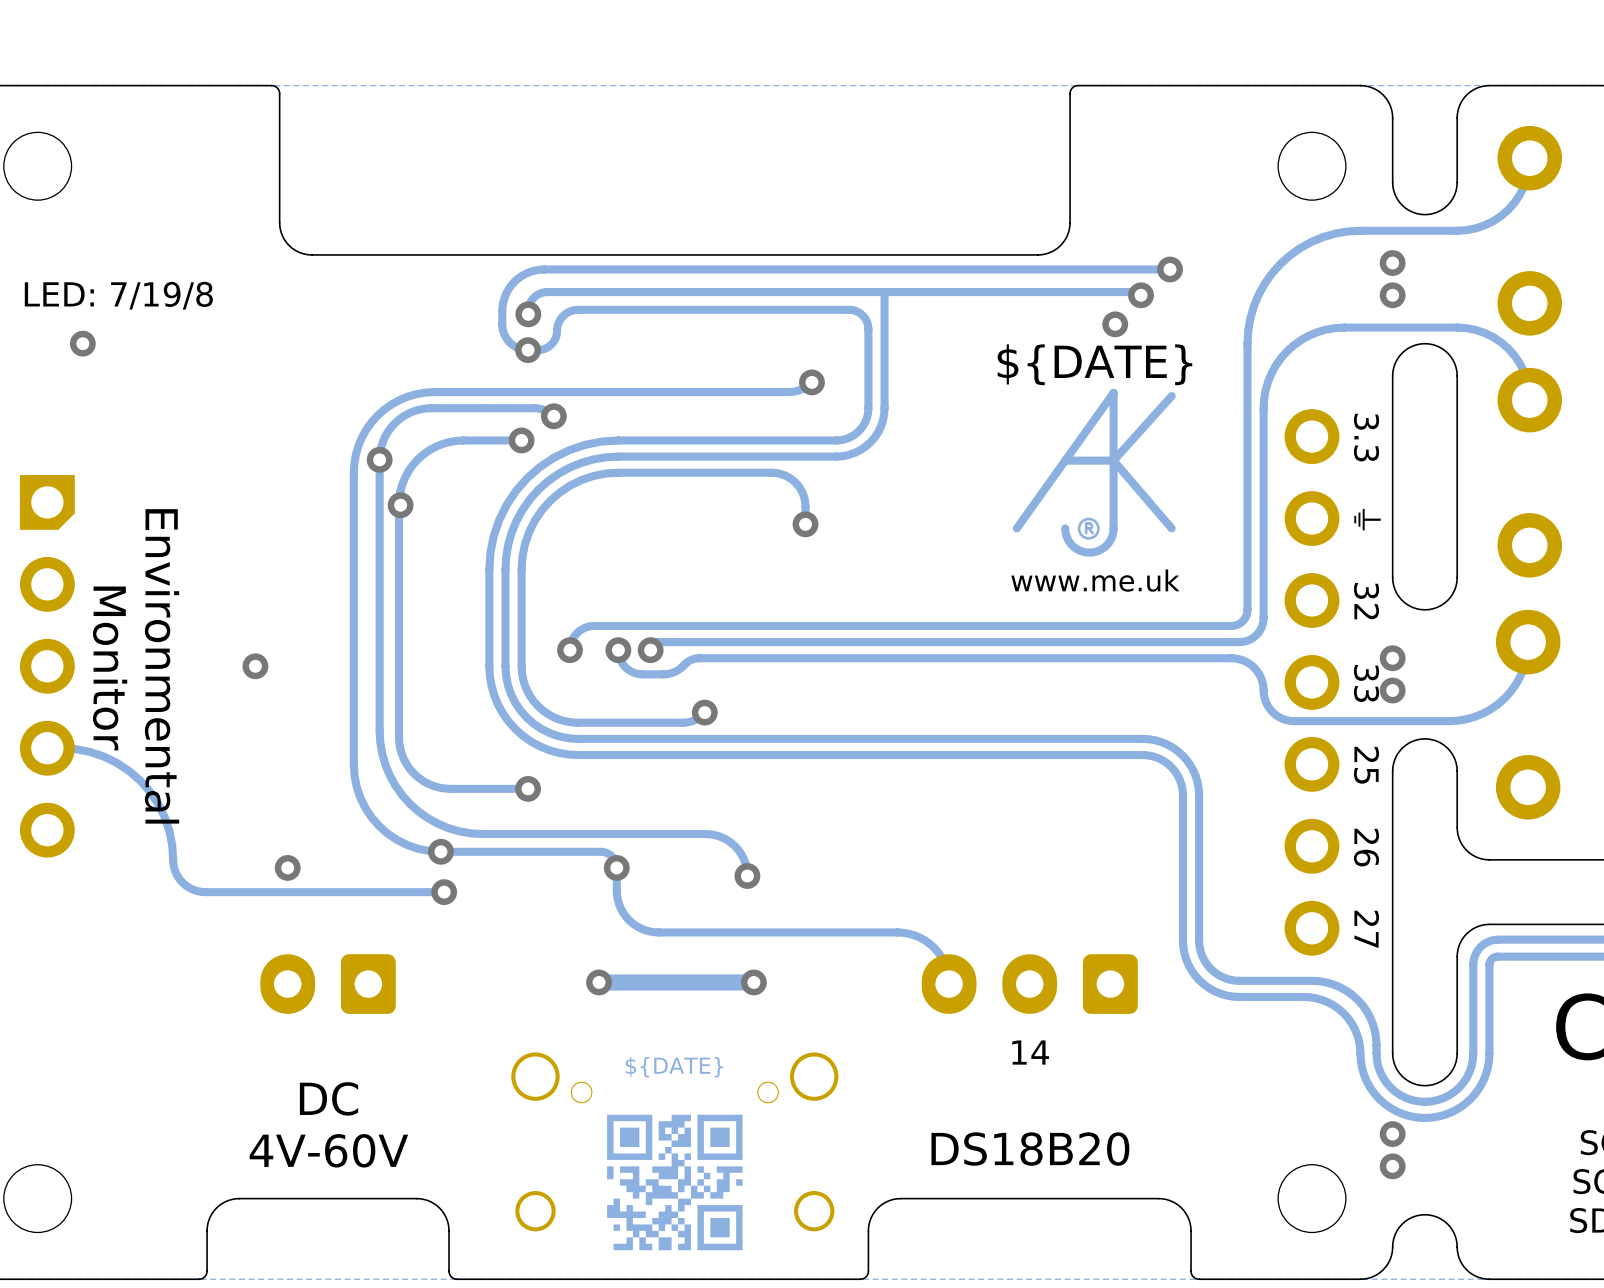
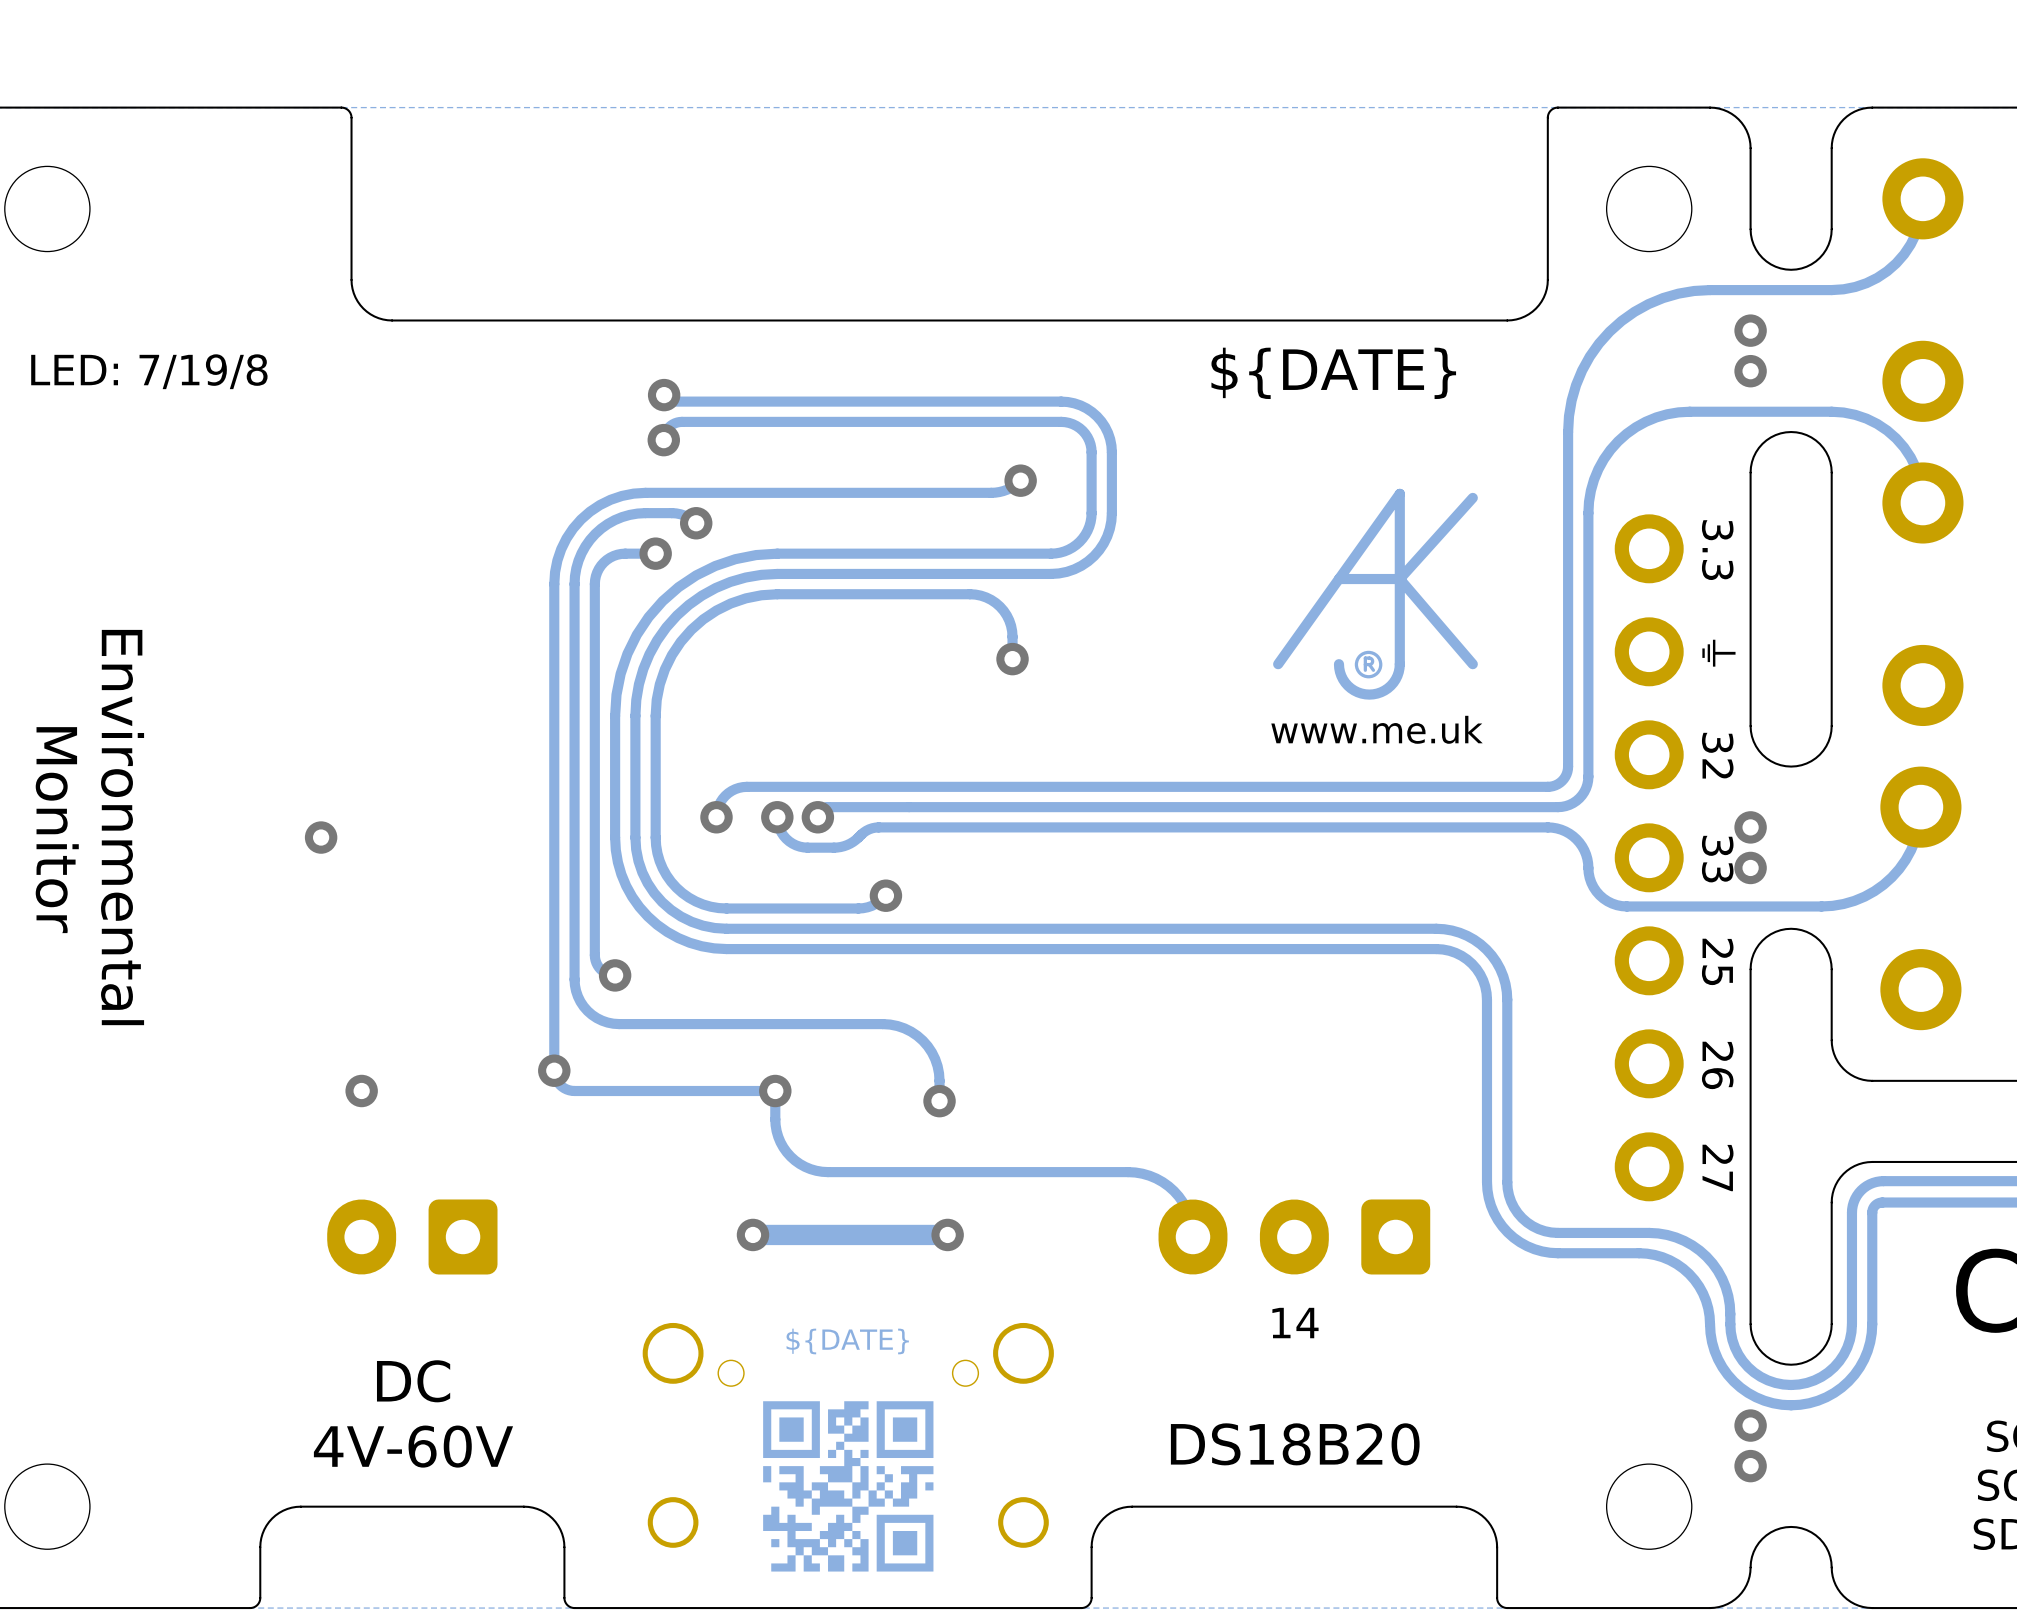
board edge: (1239, 85) (1078, 85) (1073, 87) (1070, 93) (1069, 229) (1065, 239) (1057, 247) (1048, 253) (1037, 254) -> (1557, 107) (1550, 110) (1547, 116) (1547, 284) (1543, 297) (1532, 311) (1520, 318) (1507, 320) (1304, 320)
track: (1170, 269) (544, 269) (525, 273) (514, 281) (506, 293) (502, 306) (502, 327) (505, 337) (515, 346) (528, 350) (540, 349) (549, 346) (555, 338) (561, 318) (567, 312) (575, 309) (851, 309) (860, 313) (867, 324) (868, 359) -> (663, 440) (669, 427) (682, 421) (1061, 421) (1072, 424) (1082, 430) (1089, 440) (1091, 452)
via: (1170, 269) -> none
track: (886, 292) (884, 293) (884, 359) -> none
track: (1141, 295) (1137, 292) (547, 292) (539, 293) (532, 299) (528, 306) (528, 314) -> (1111, 452) (1110, 439) (1101, 421) (1086, 408) (1067, 402) (670, 401) (666, 399) (664, 395)
via: (1141, 295) -> none
via: (1115, 324) -> none
via: (82, 343) -> none
text position: ${DATE} (1094, 364) -> ${DATE} (1333, 373)
track: (513, 392) (434, 392) (407, 396) (391, 404) (377, 415) (366, 429) (358, 446) (353, 472) (353, 764) (356, 787) (365, 808) (379, 826) (397, 840) (418, 848) (440, 851) (602, 851) (612, 856) (616, 867) -> (645, 492) (633, 493) (610, 499) (589, 511) (581, 519) (566, 538) (557, 560) (555, 572) (554, 1075) (560, 1085) (571, 1090) (775, 1091)
track: (513, 408) (419, 409) (403, 416) (394, 423) (382, 442) (379, 459) (379, 730) (382, 753) (389, 775) (402, 795) (418, 811) (438, 823) (459, 831) (482, 834) (710, 834) (723, 838) (738, 849) (745, 862) (747, 875) -> (645, 513) (622, 517) (601, 528) (590, 539) (581, 553) (575, 576) (574, 979) (576, 991) (580, 1001) (592, 1014) (602, 1020) (613, 1023) (882, 1024) (897, 1026) (917, 1035) (931, 1052) (939, 1073) (939, 1101)
track: (497, 440) (456, 440) (442, 444) (428, 450) (417, 459) (405, 477) (400, 491) (400, 505) -> (625, 553) (613, 555) (603, 562) (597, 572) (594, 584) (594, 955) (596, 962) (600, 969) (607, 973) (615, 975)
via: (379, 459) -> none
track: (400, 505) (399, 506) (399, 737) (404, 759) (418, 777) (439, 787) (528, 788) -> none
via: (400, 505) -> none
part: (47, 666) -> none
text position: Environmental (162, 666) -> Environmental (122, 827)
text position: Monitor (110, 668) -> Monitor (57, 830)
track: (47, 748) (76, 749) (104, 756) (117, 763) (140, 780) (158, 804) (164, 817) (169, 830) (176, 873) (182, 882) (194, 890) (205, 892) (444, 892) -> none
via position: (528, 788) -> (615, 975)
via: (444, 892) -> none

